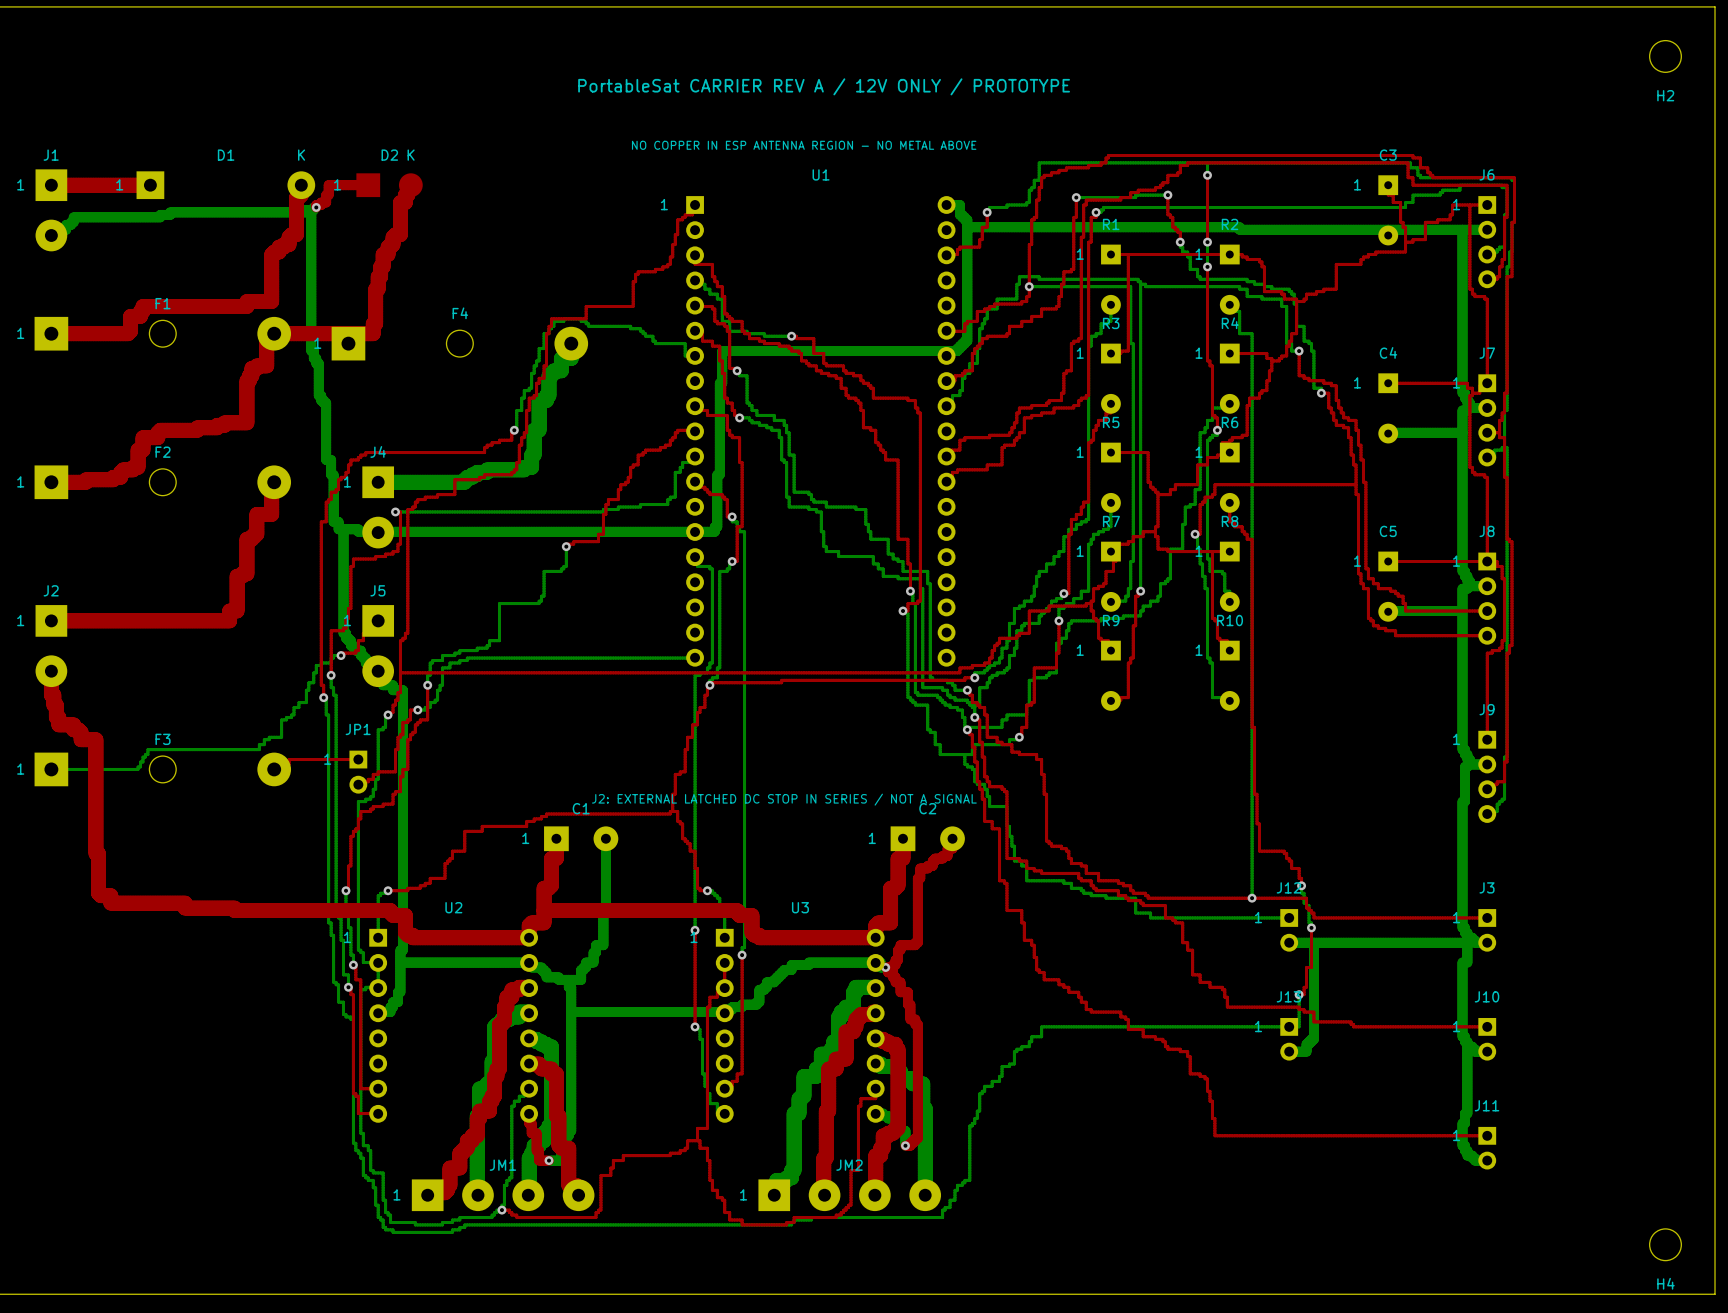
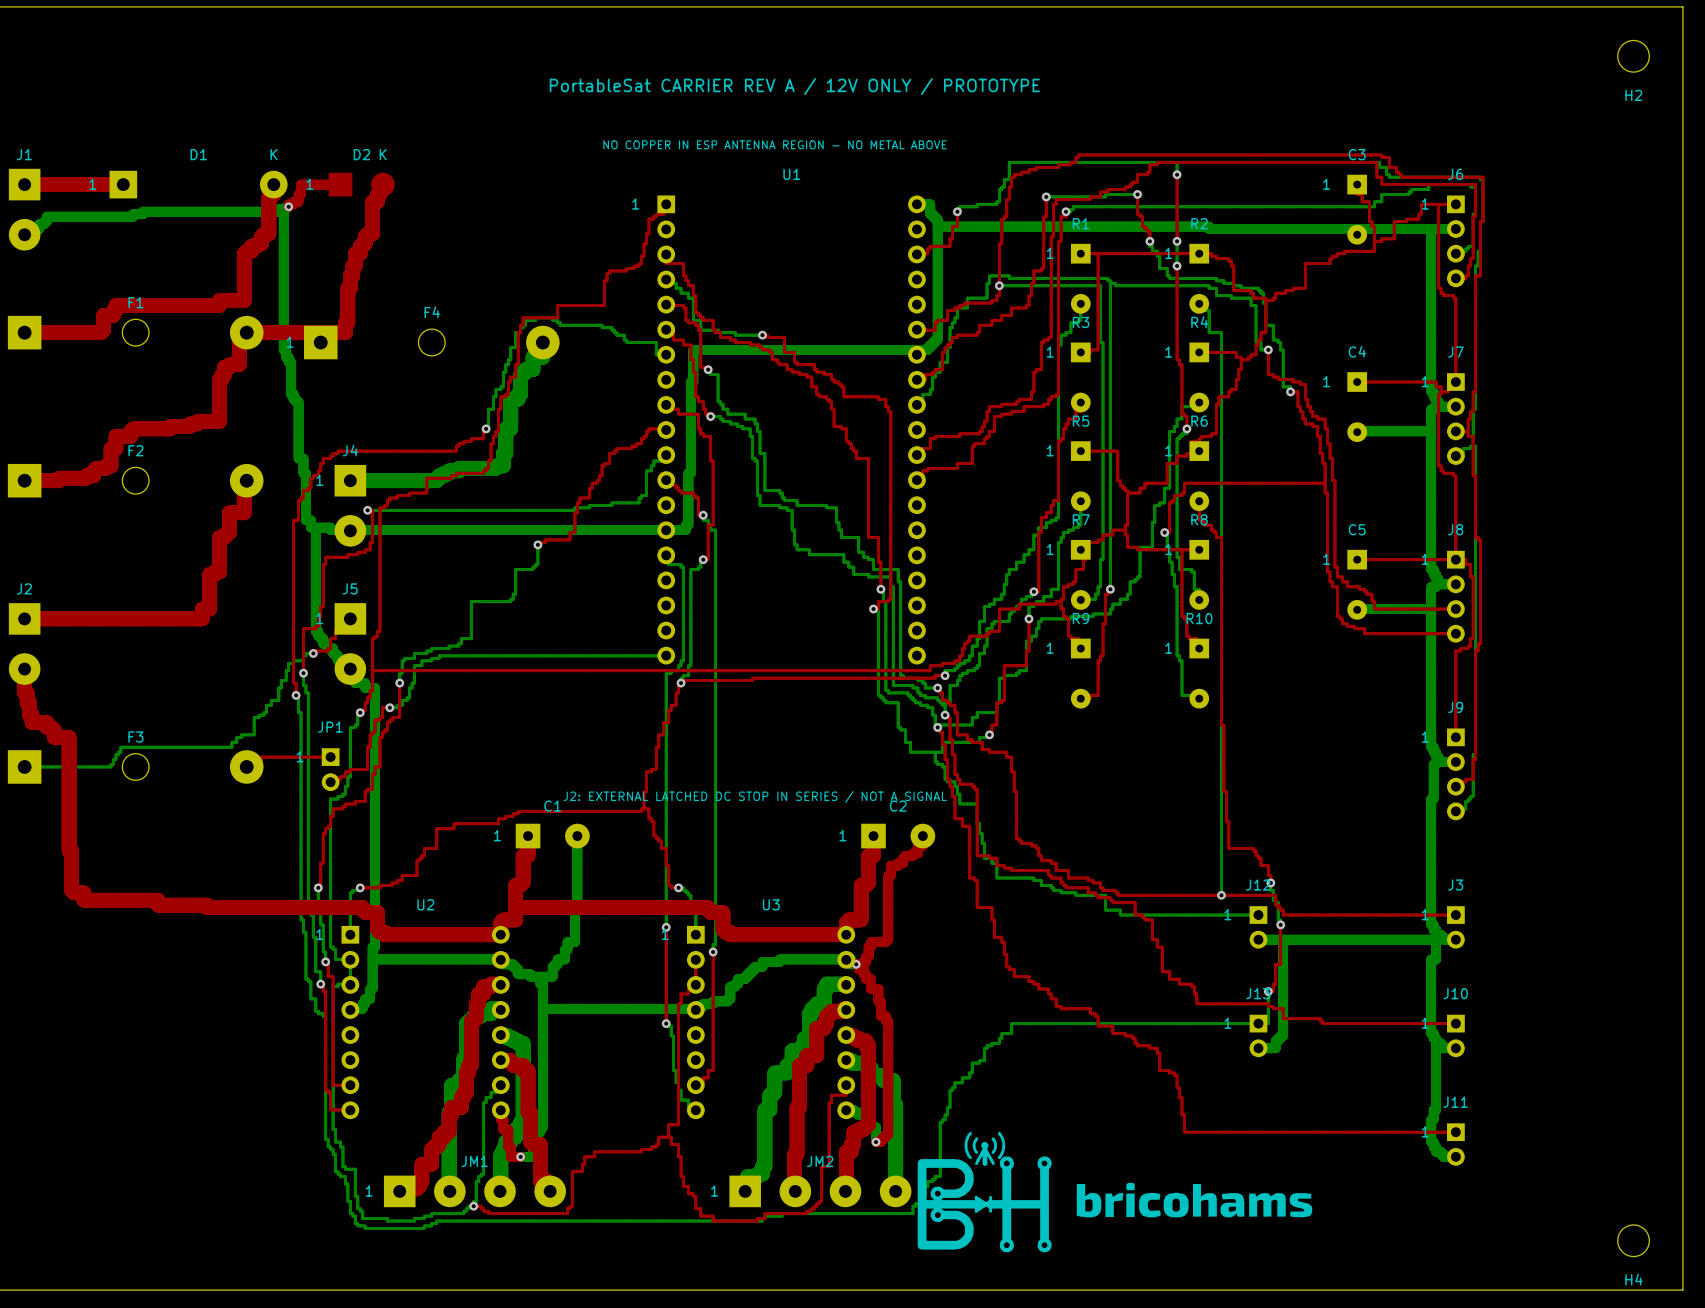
drawing: none -> [917, 1131, 1052, 1253]
drawing: none -> [1076, 1182, 1313, 1218]

